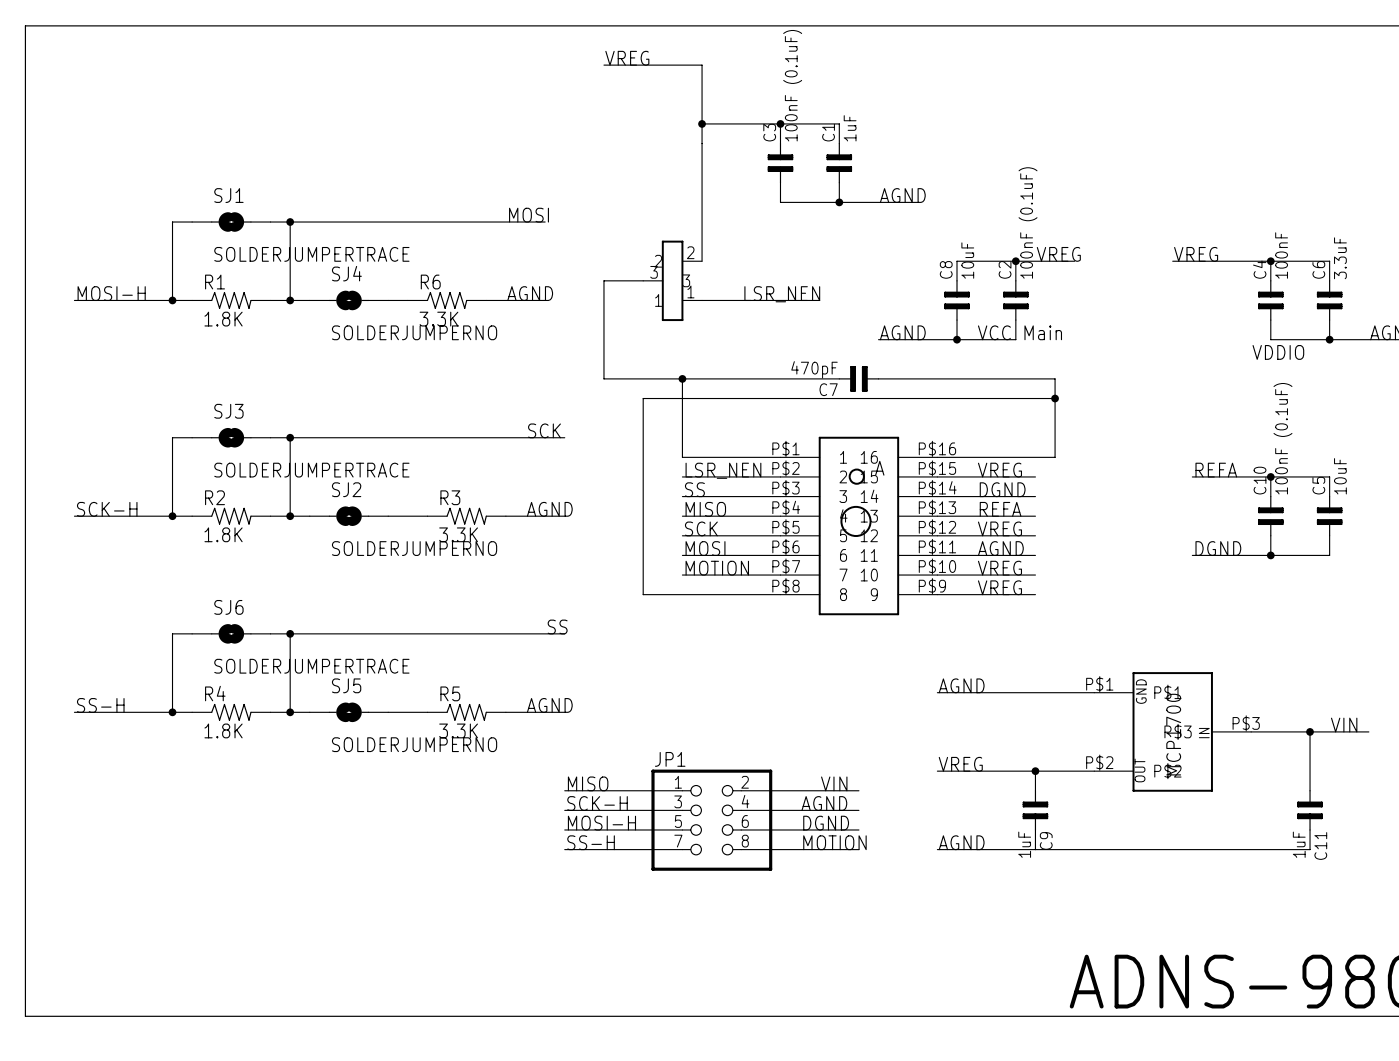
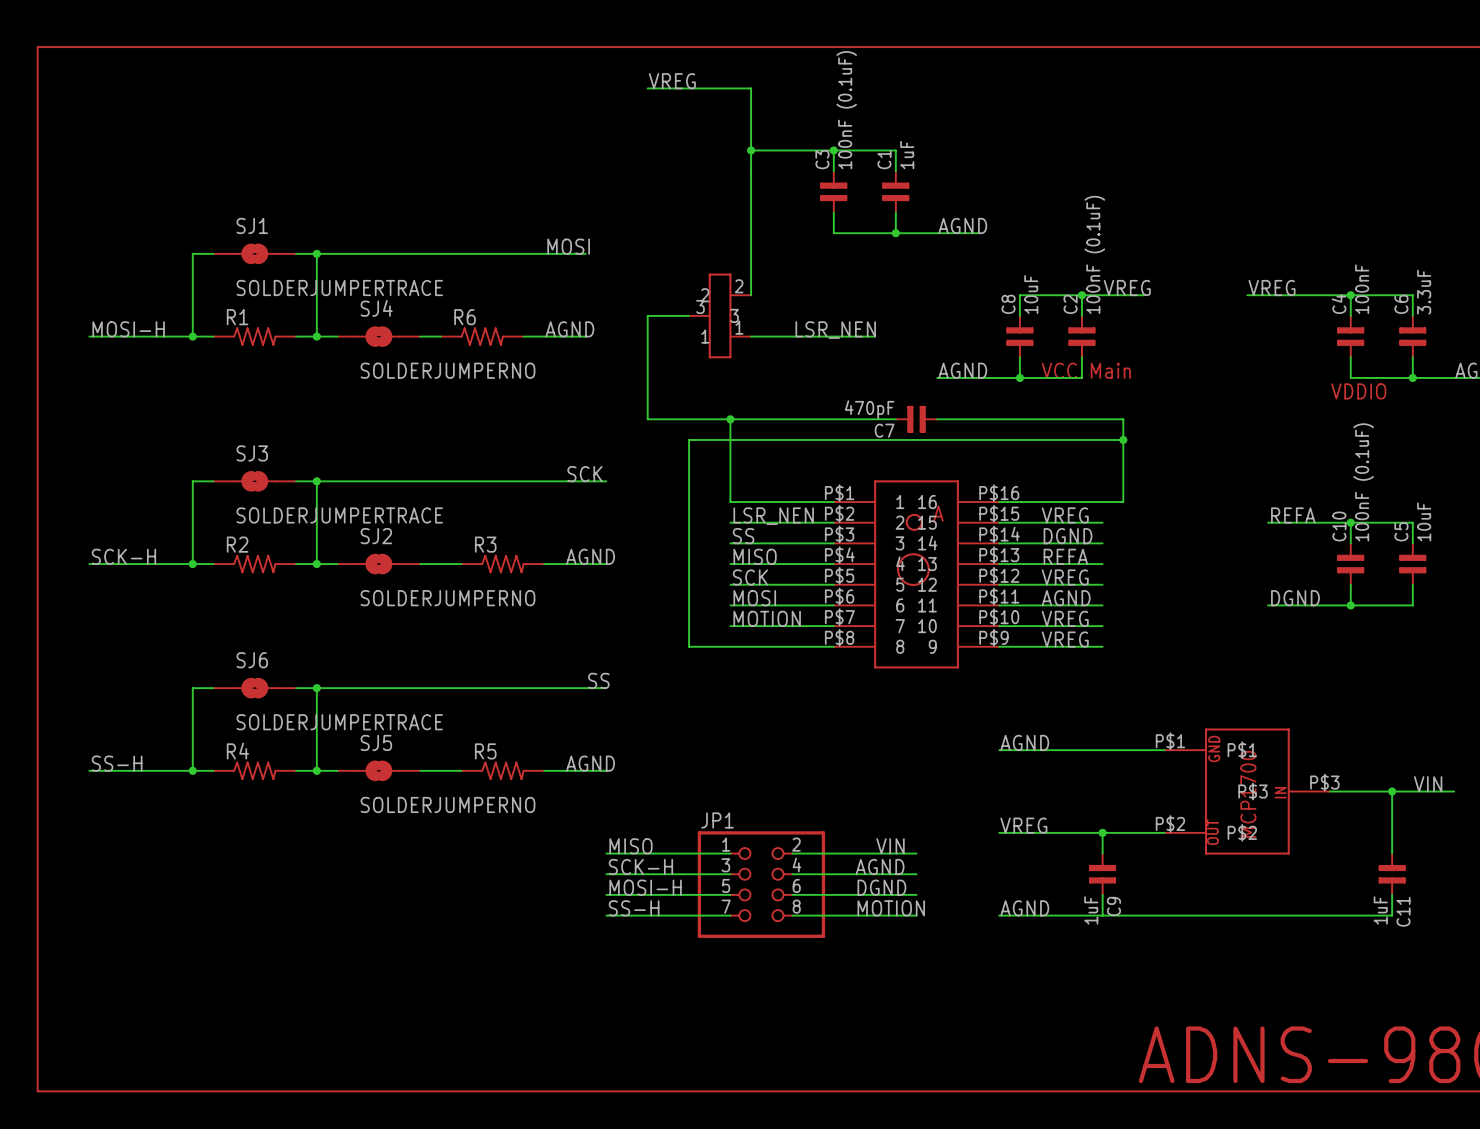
R1 value: 1.8K (223, 319) -> none
R6 value: 3.3K (438, 319) -> none
R2 value: 1.8K (223, 534) -> none
R3 value: 3.3K (458, 534) -> none
R4 value: 1.8K (223, 730) -> none
R5 value: 3.3K (458, 730) -> none

